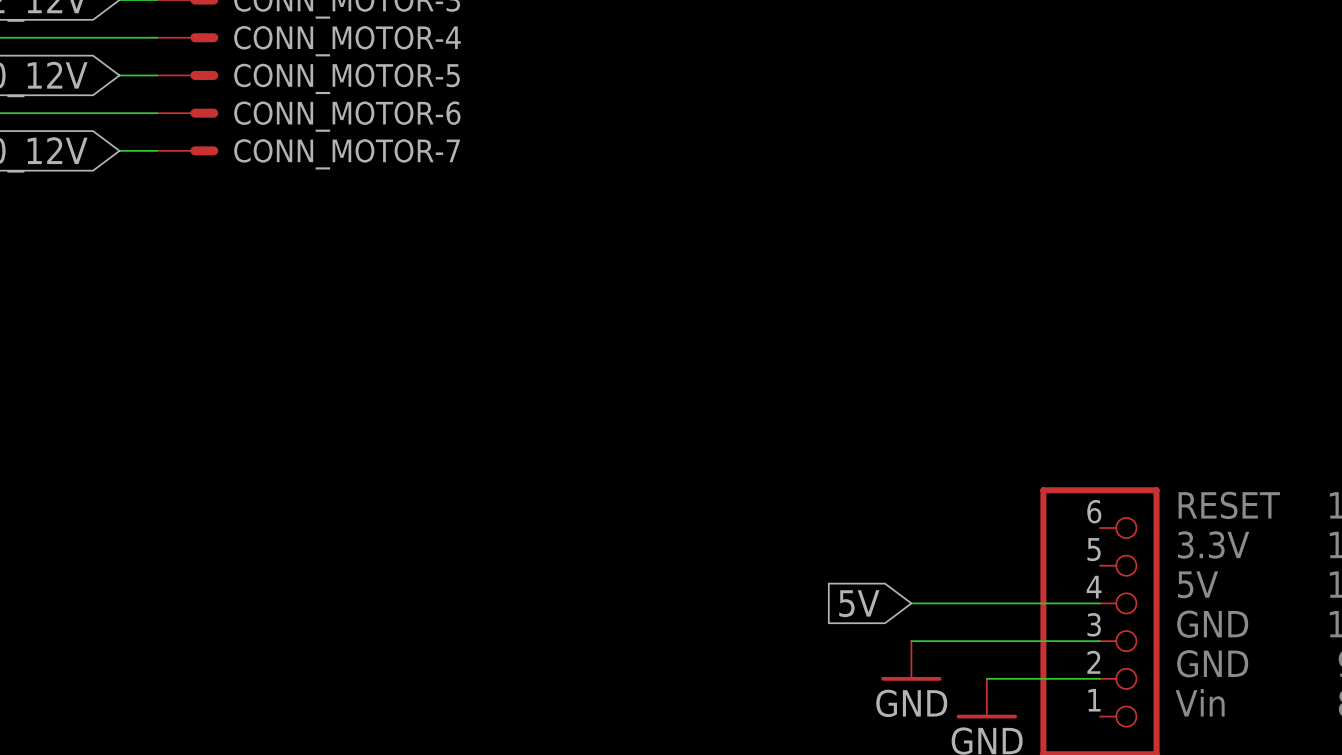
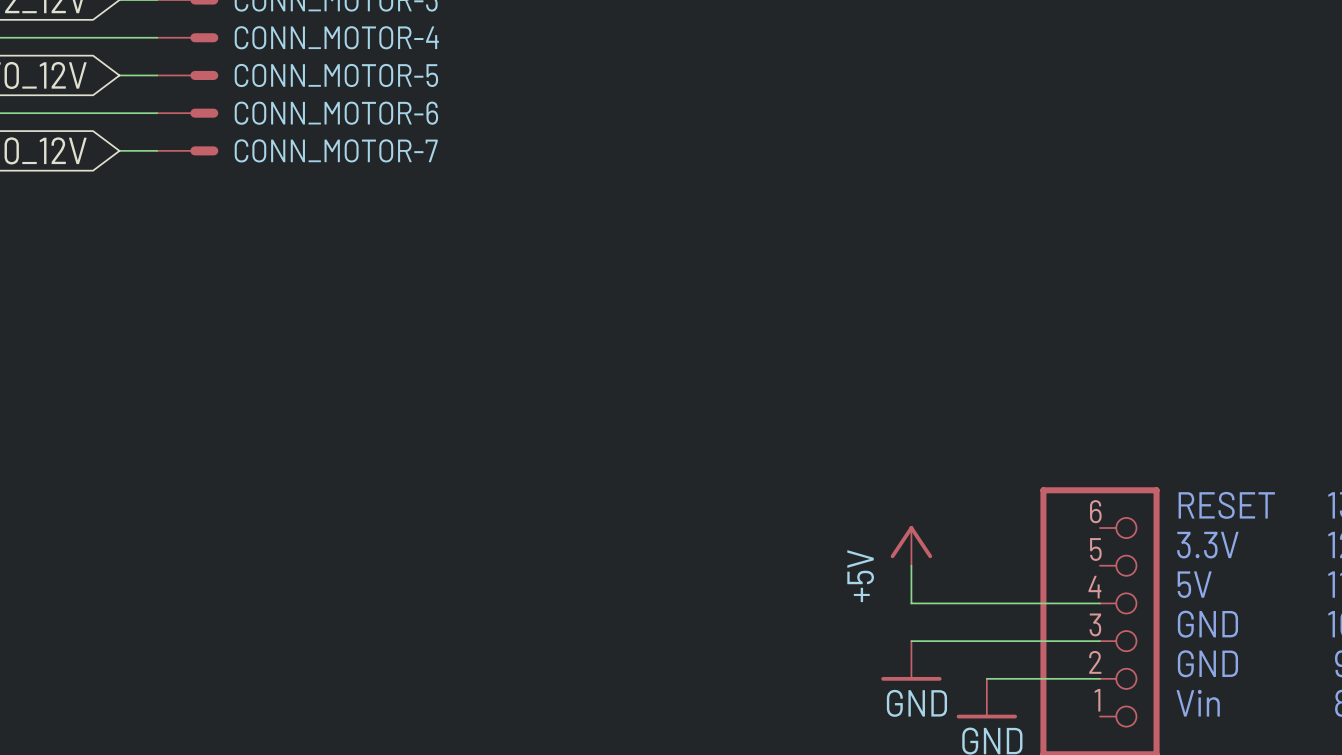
power symbol: none -> +5V (911, 545)
wire: none -> (911, 565) (911, 603)
global label: 5V (859, 603) -> none

